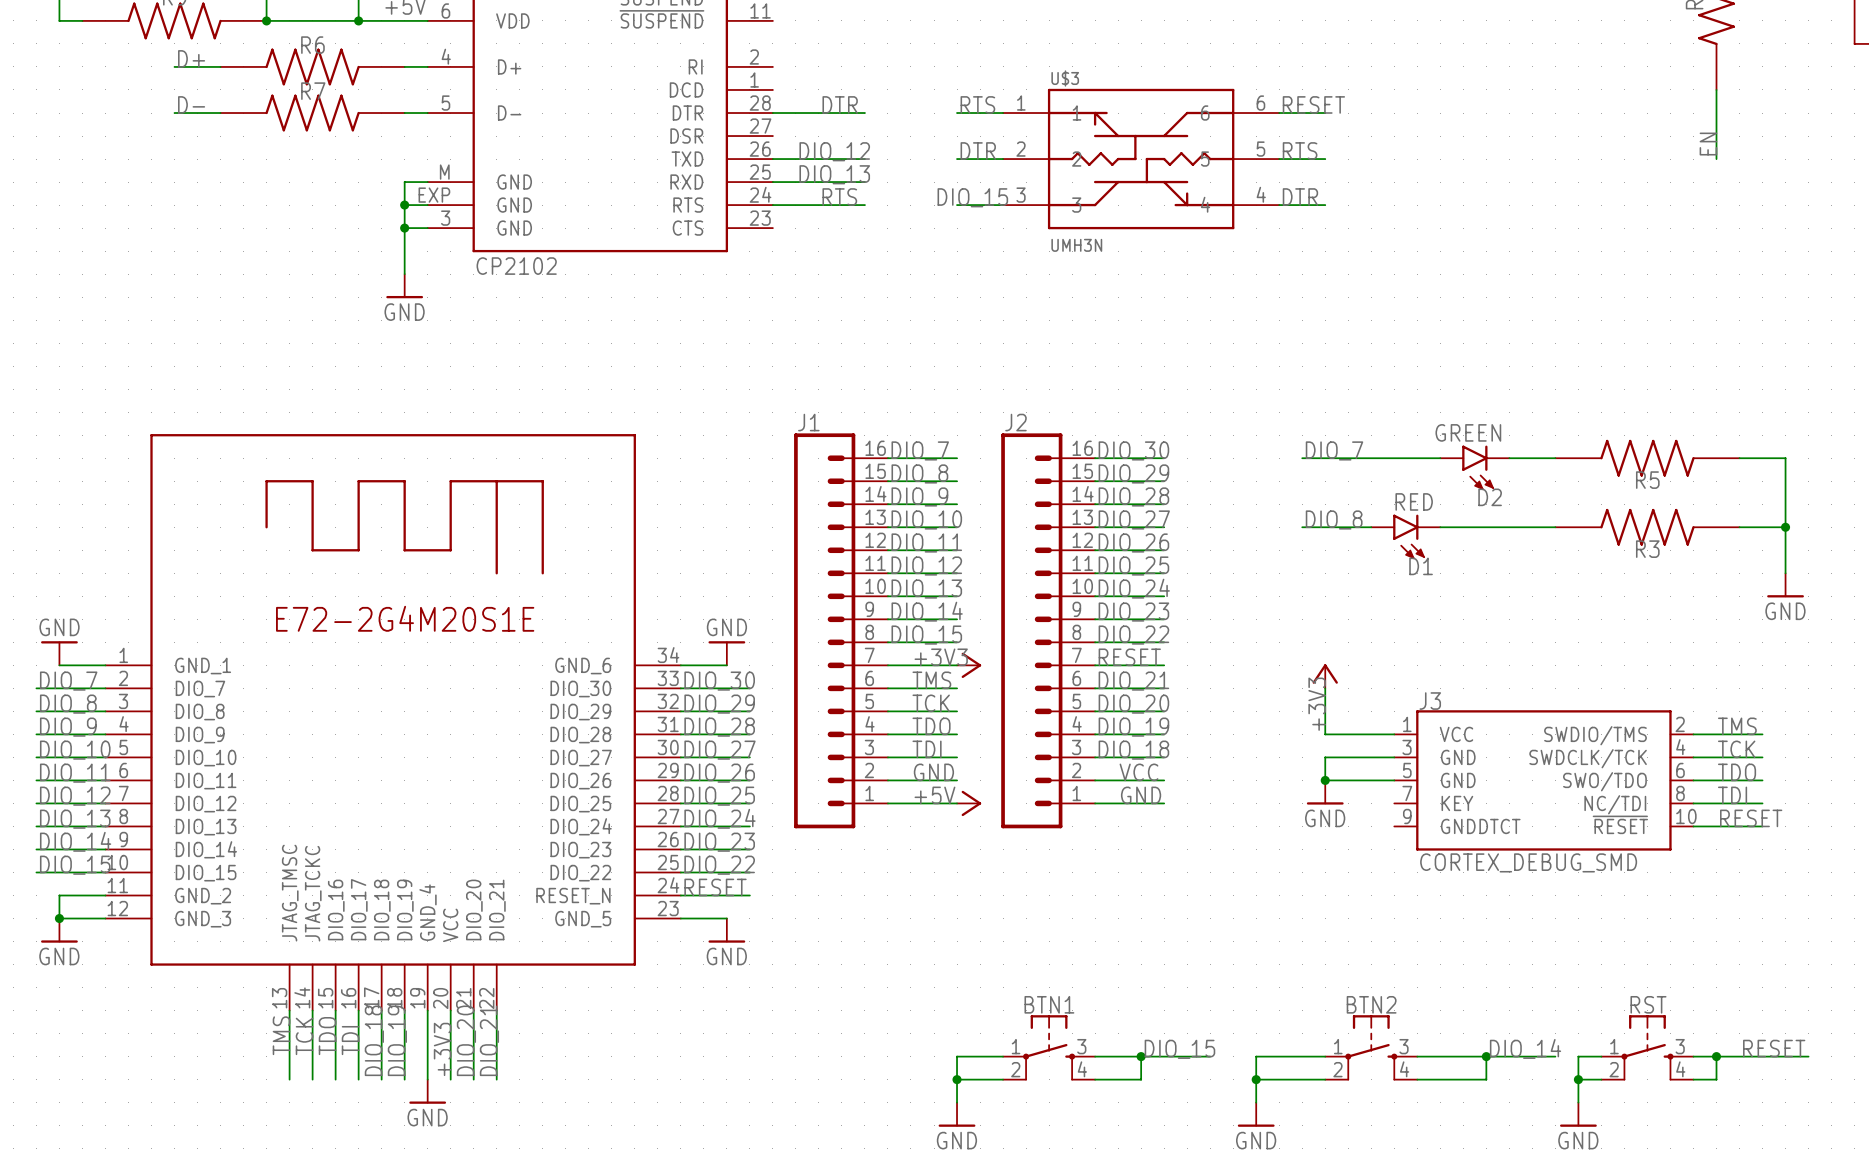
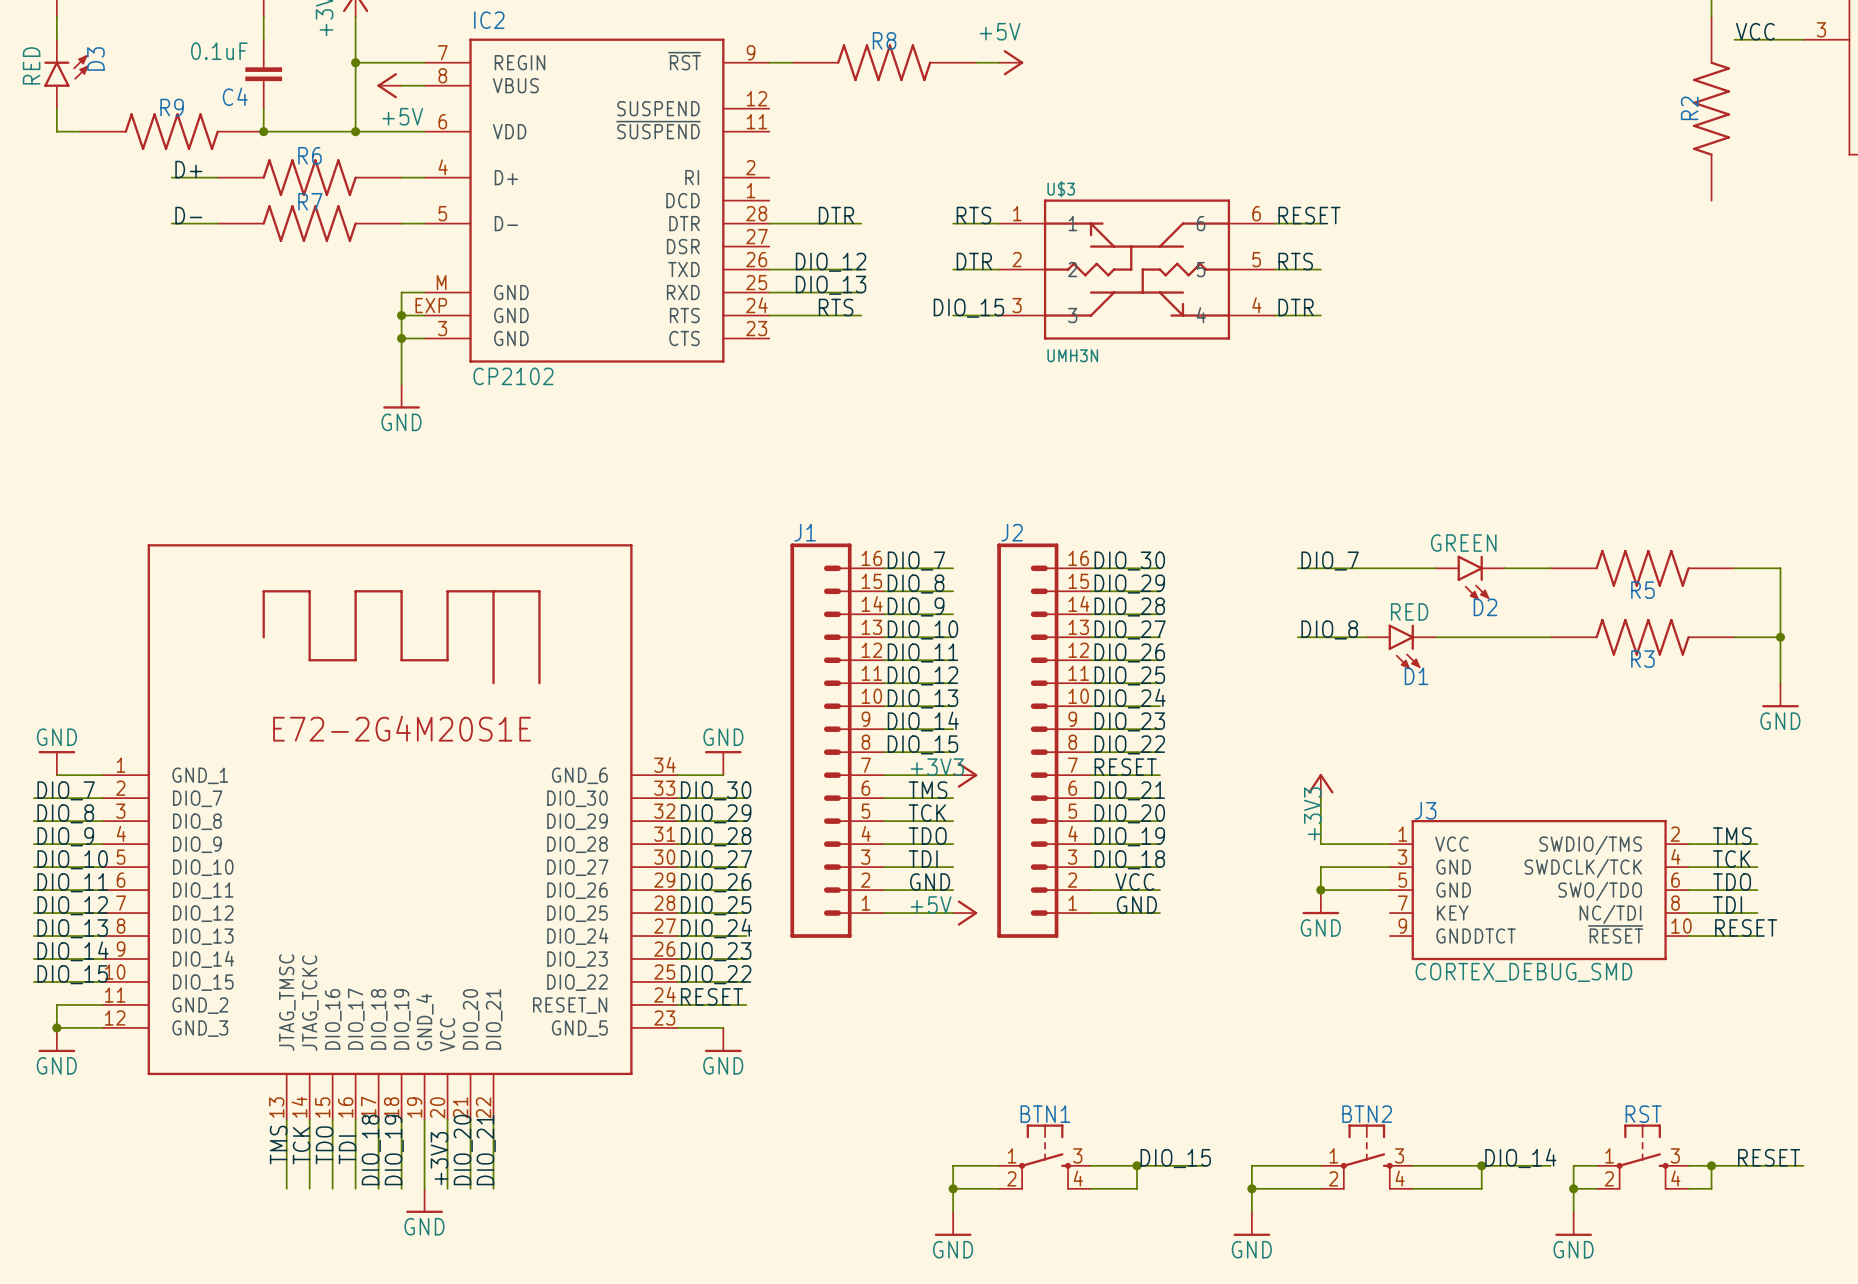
wire: (1716, 89) (1716, 159) -> none
label: EN (1708, 144) -> none

